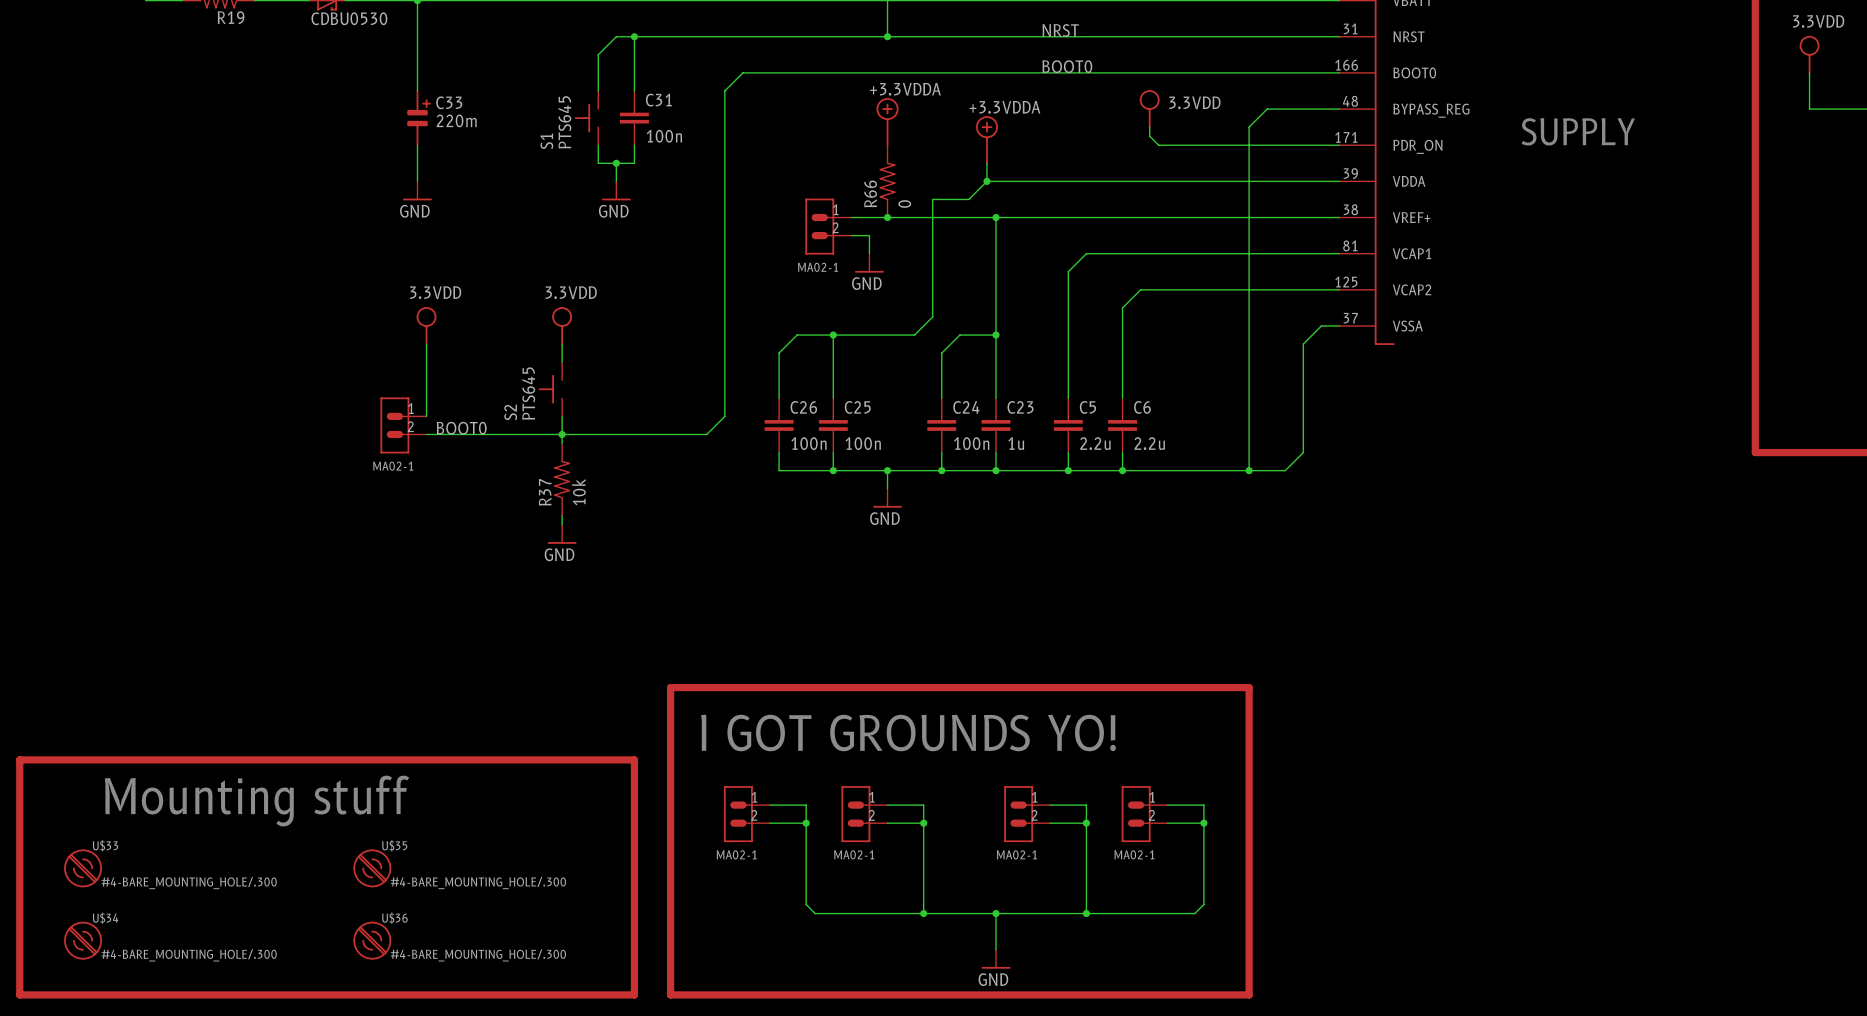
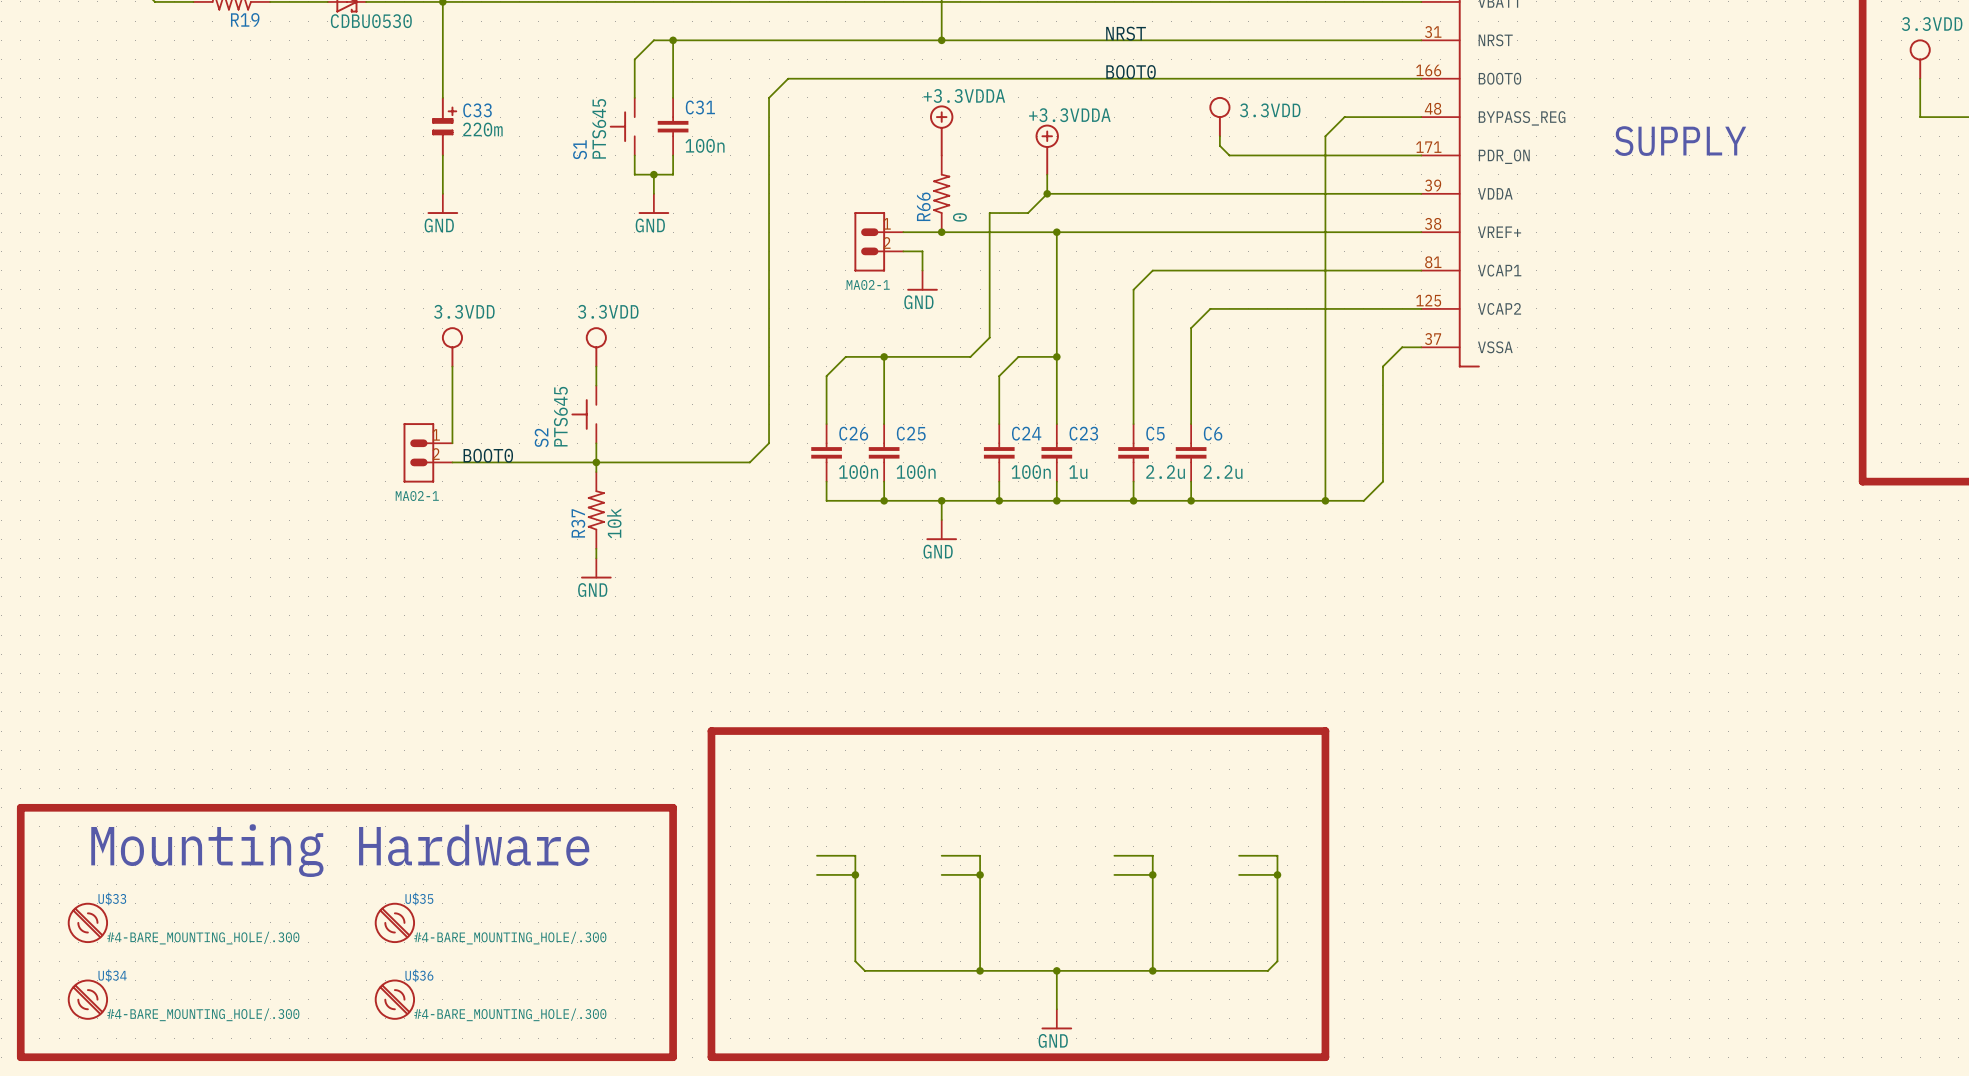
text: I GOT GROUNDS YO! (908, 732) -> none
text: Mounting stuff (256, 801) -> none
text: none -> Mounting Hardware (340, 850)
part: MA02-1 (746, 814) -> none
part: MA02-1 (864, 814) -> none
part: MA02-1 (1027, 814) -> none
part: MA02-1 (1144, 814) -> none

